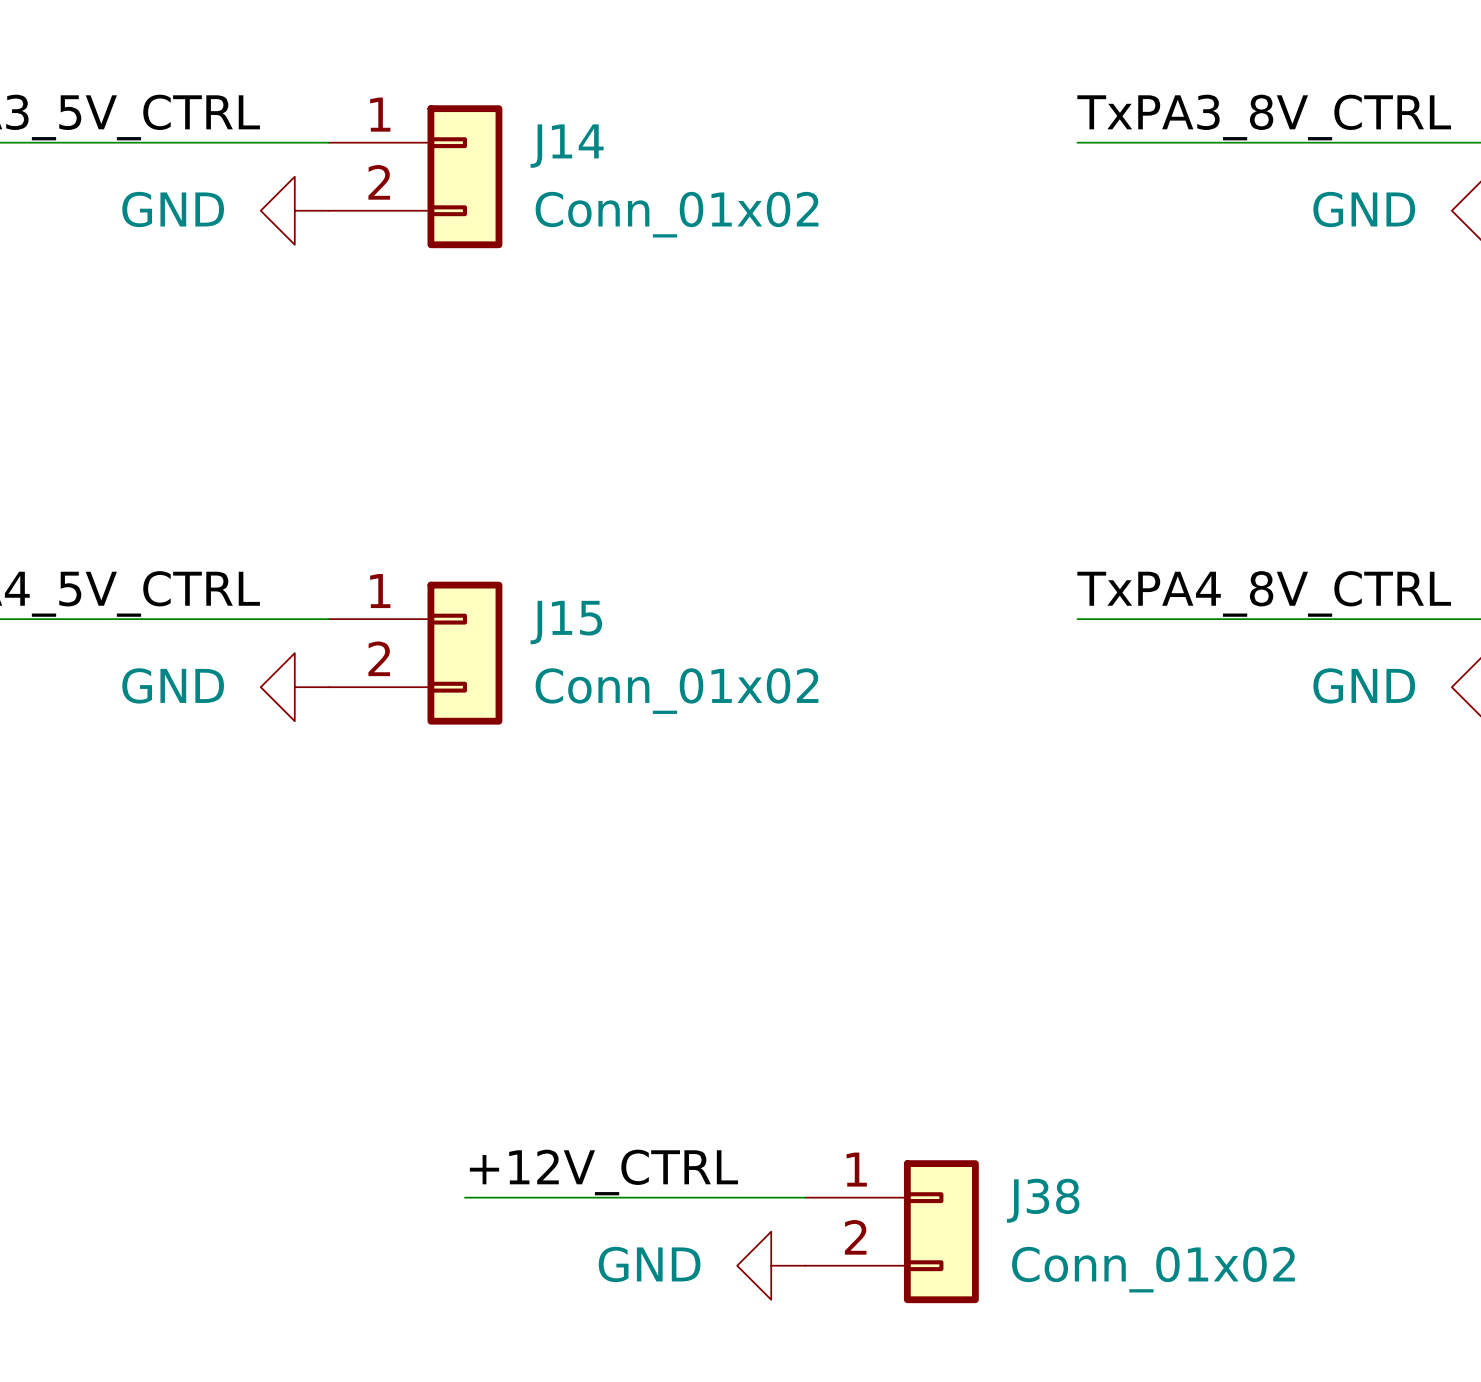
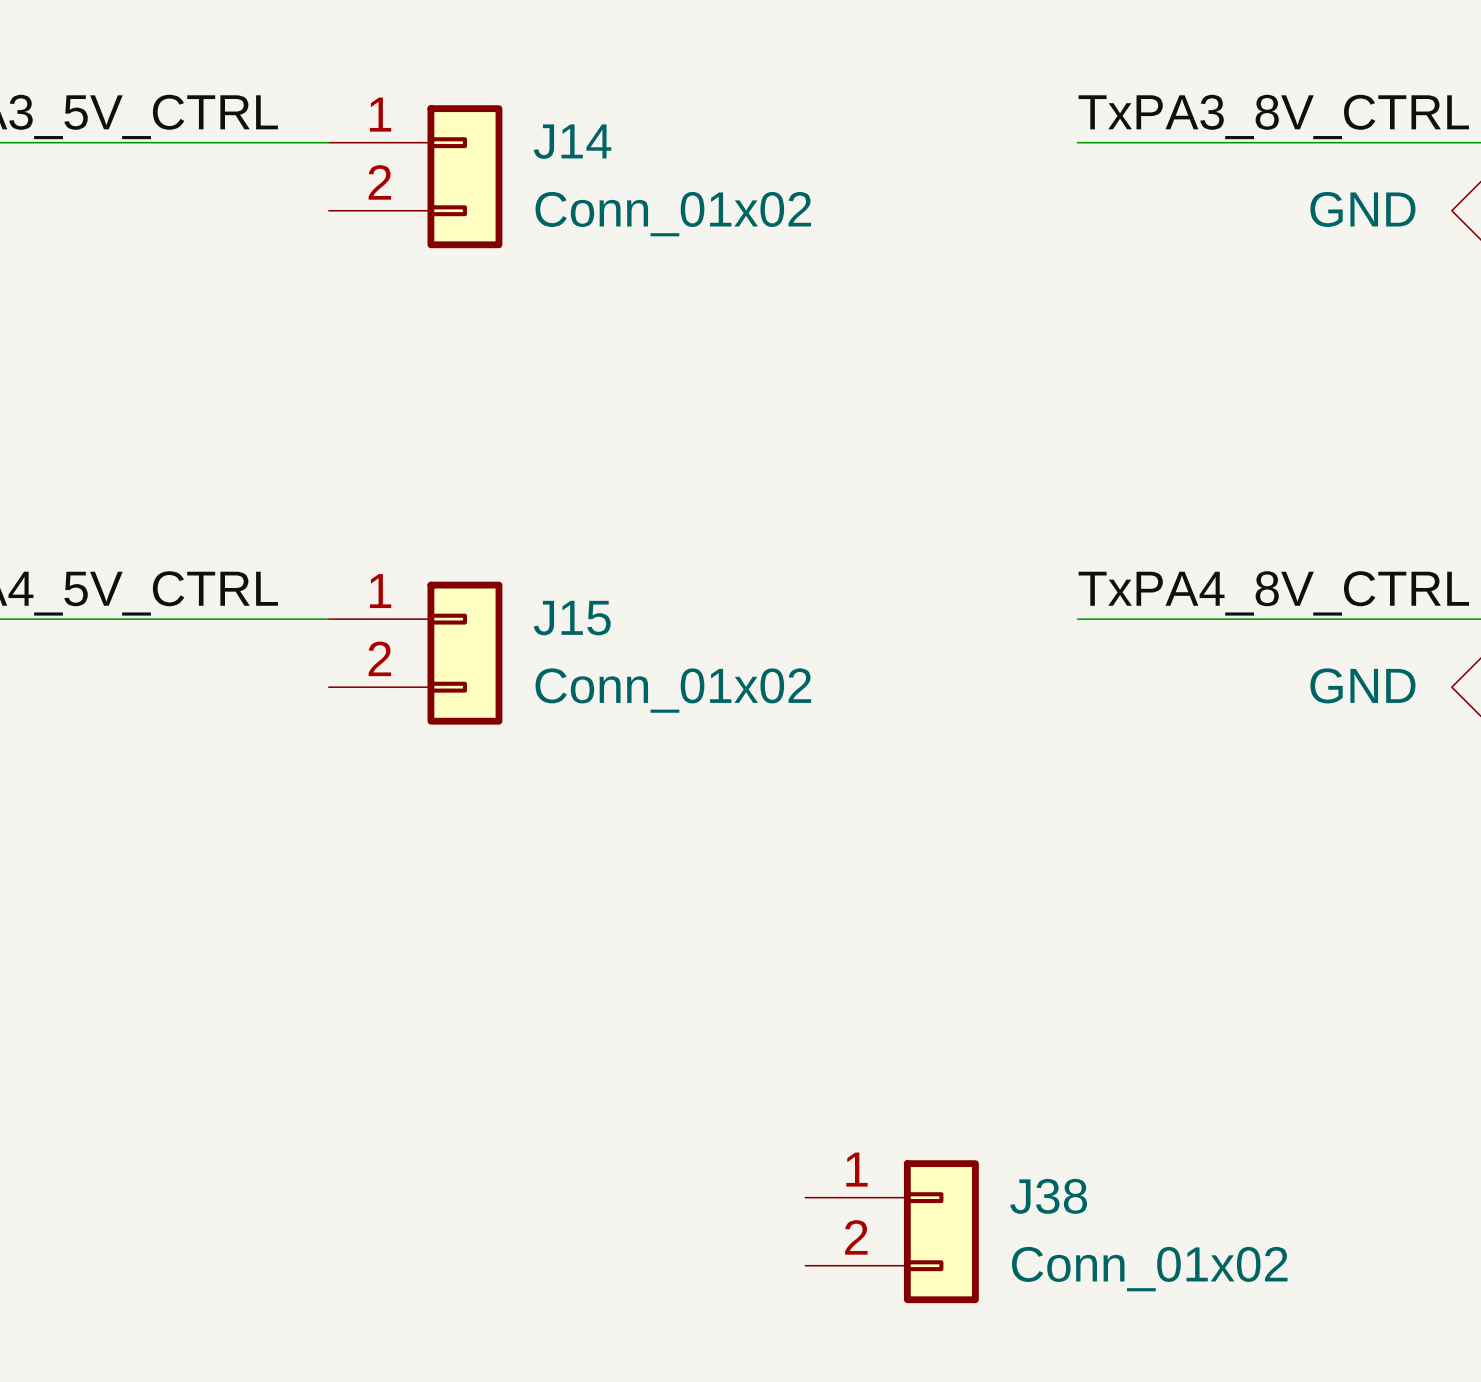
power symbol: GND (294, 210) -> none
power symbol: GND (294, 687) -> none
label: +12V_CTRL (603, 1172) -> none
wire: (464, 1197) (805, 1197) -> none
power symbol: GND (771, 1265) -> none

